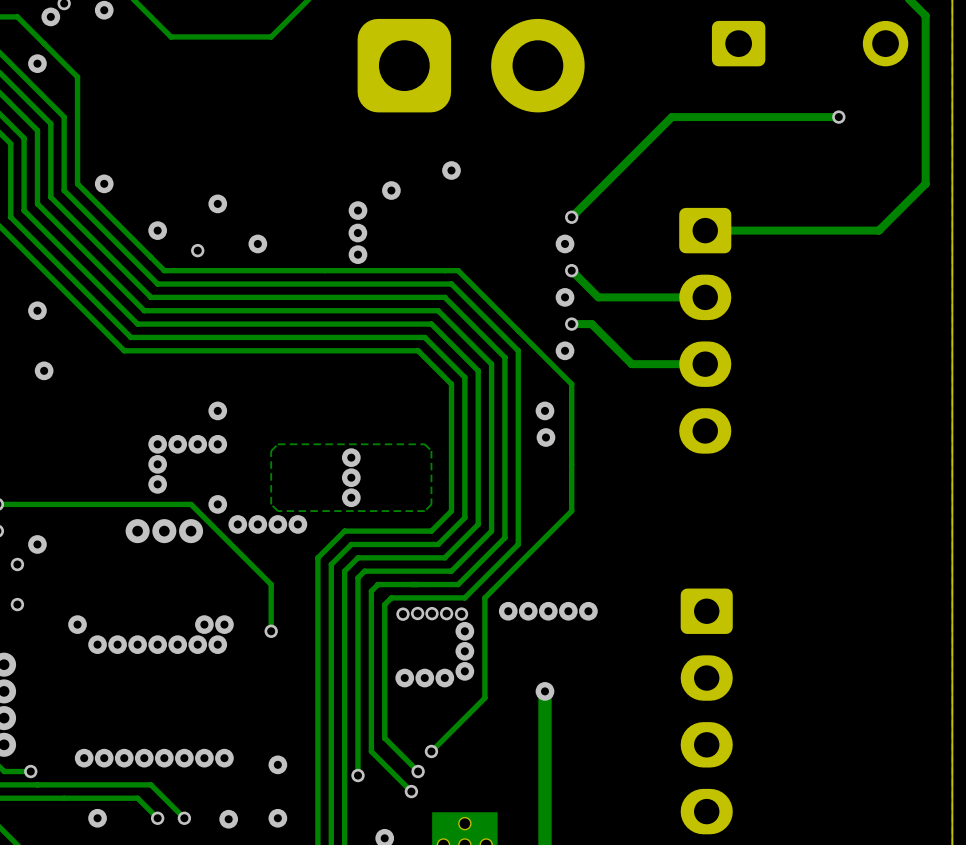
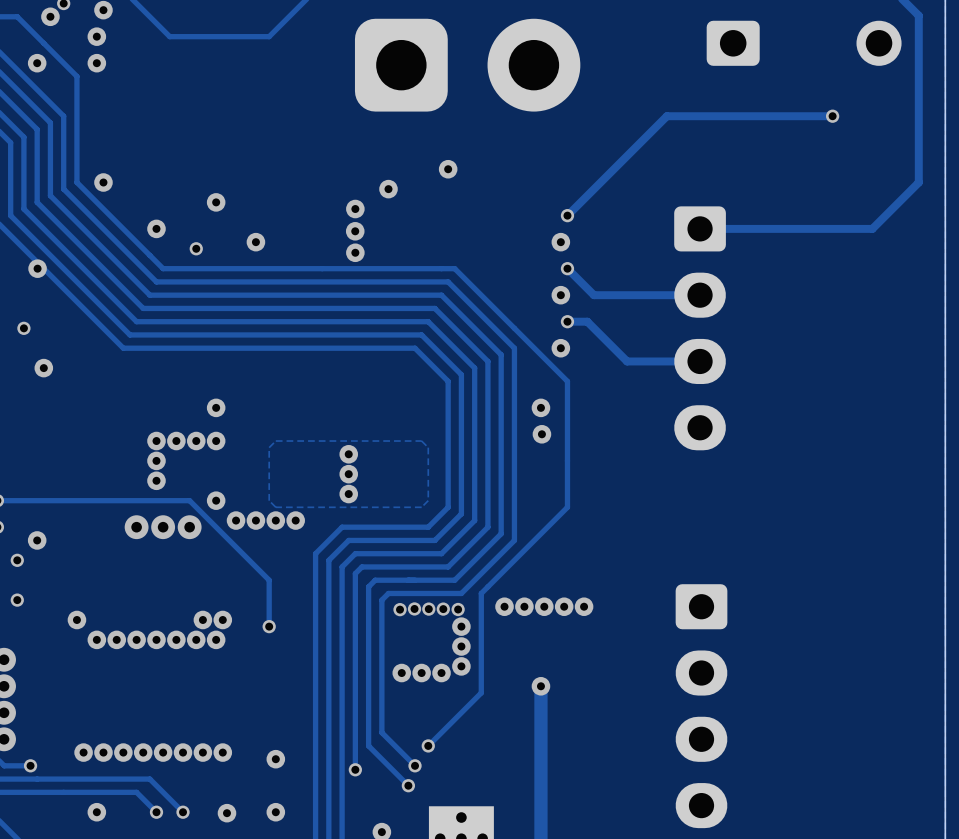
via: none -> (96, 36)
via: none -> (96, 63)
via position: (37, 310) -> (37, 268)
via: none -> (23, 328)

